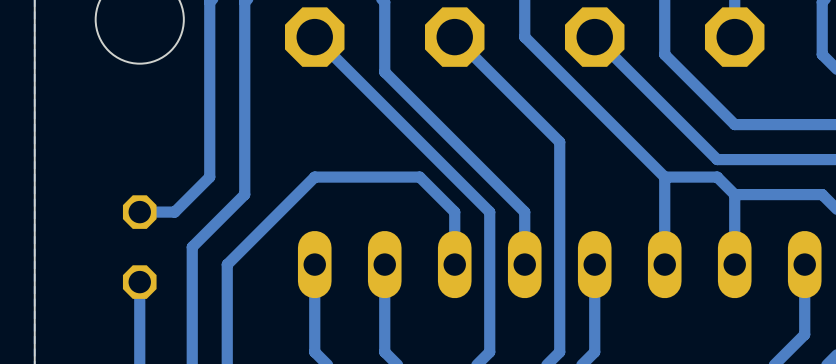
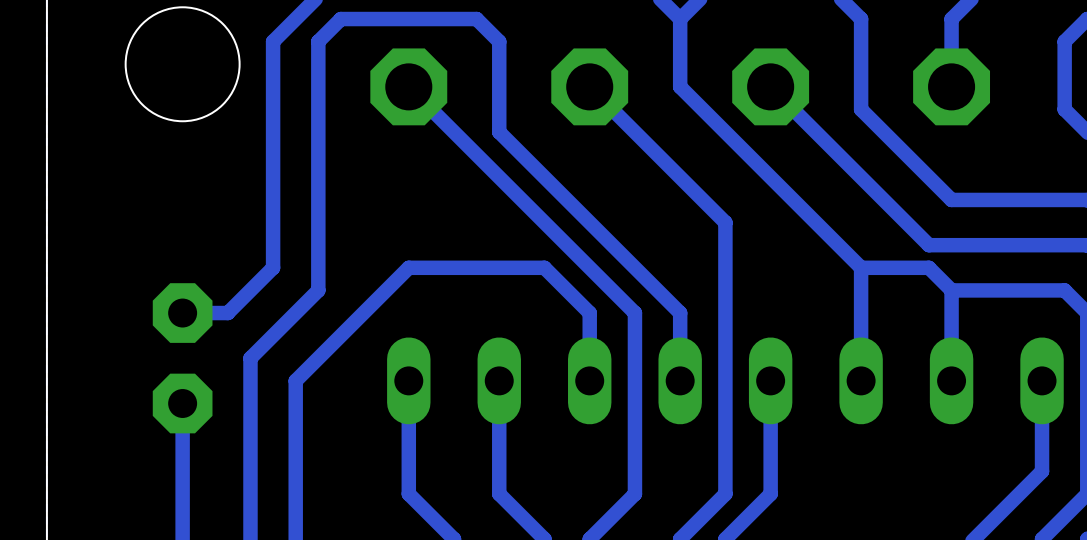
part footprint: [122, 195, 157, 299] -> [152, 283, 213, 434]

